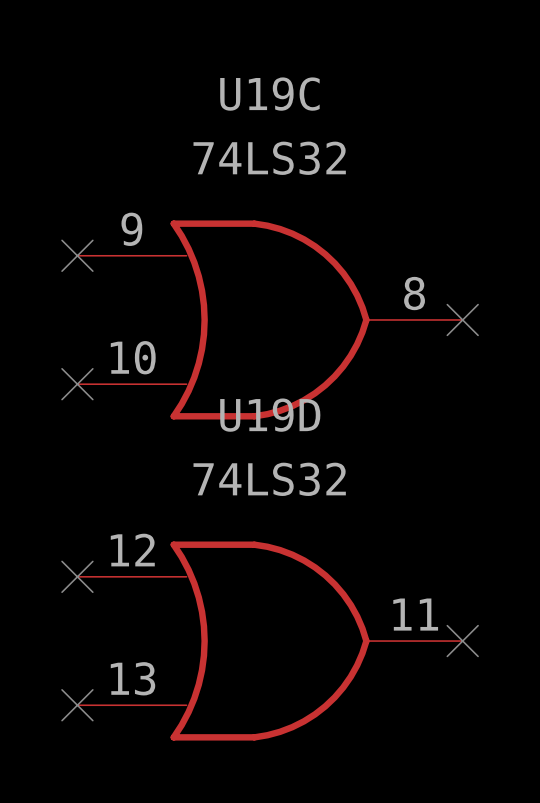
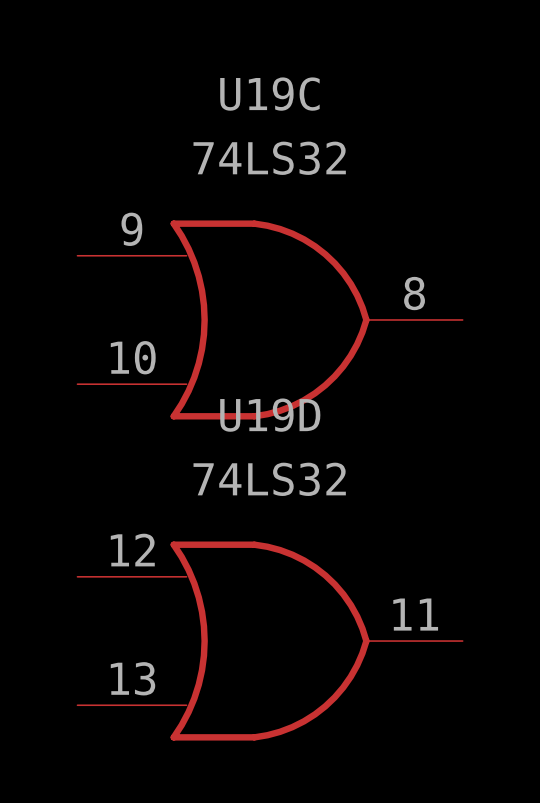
no-connect mark: (77, 255) -> none
no-connect mark: (462, 319) -> none
no-connect mark: (77, 384) -> none
no-connect mark: (77, 576) -> none
no-connect mark: (462, 641) -> none
no-connect mark: (77, 705) -> none

